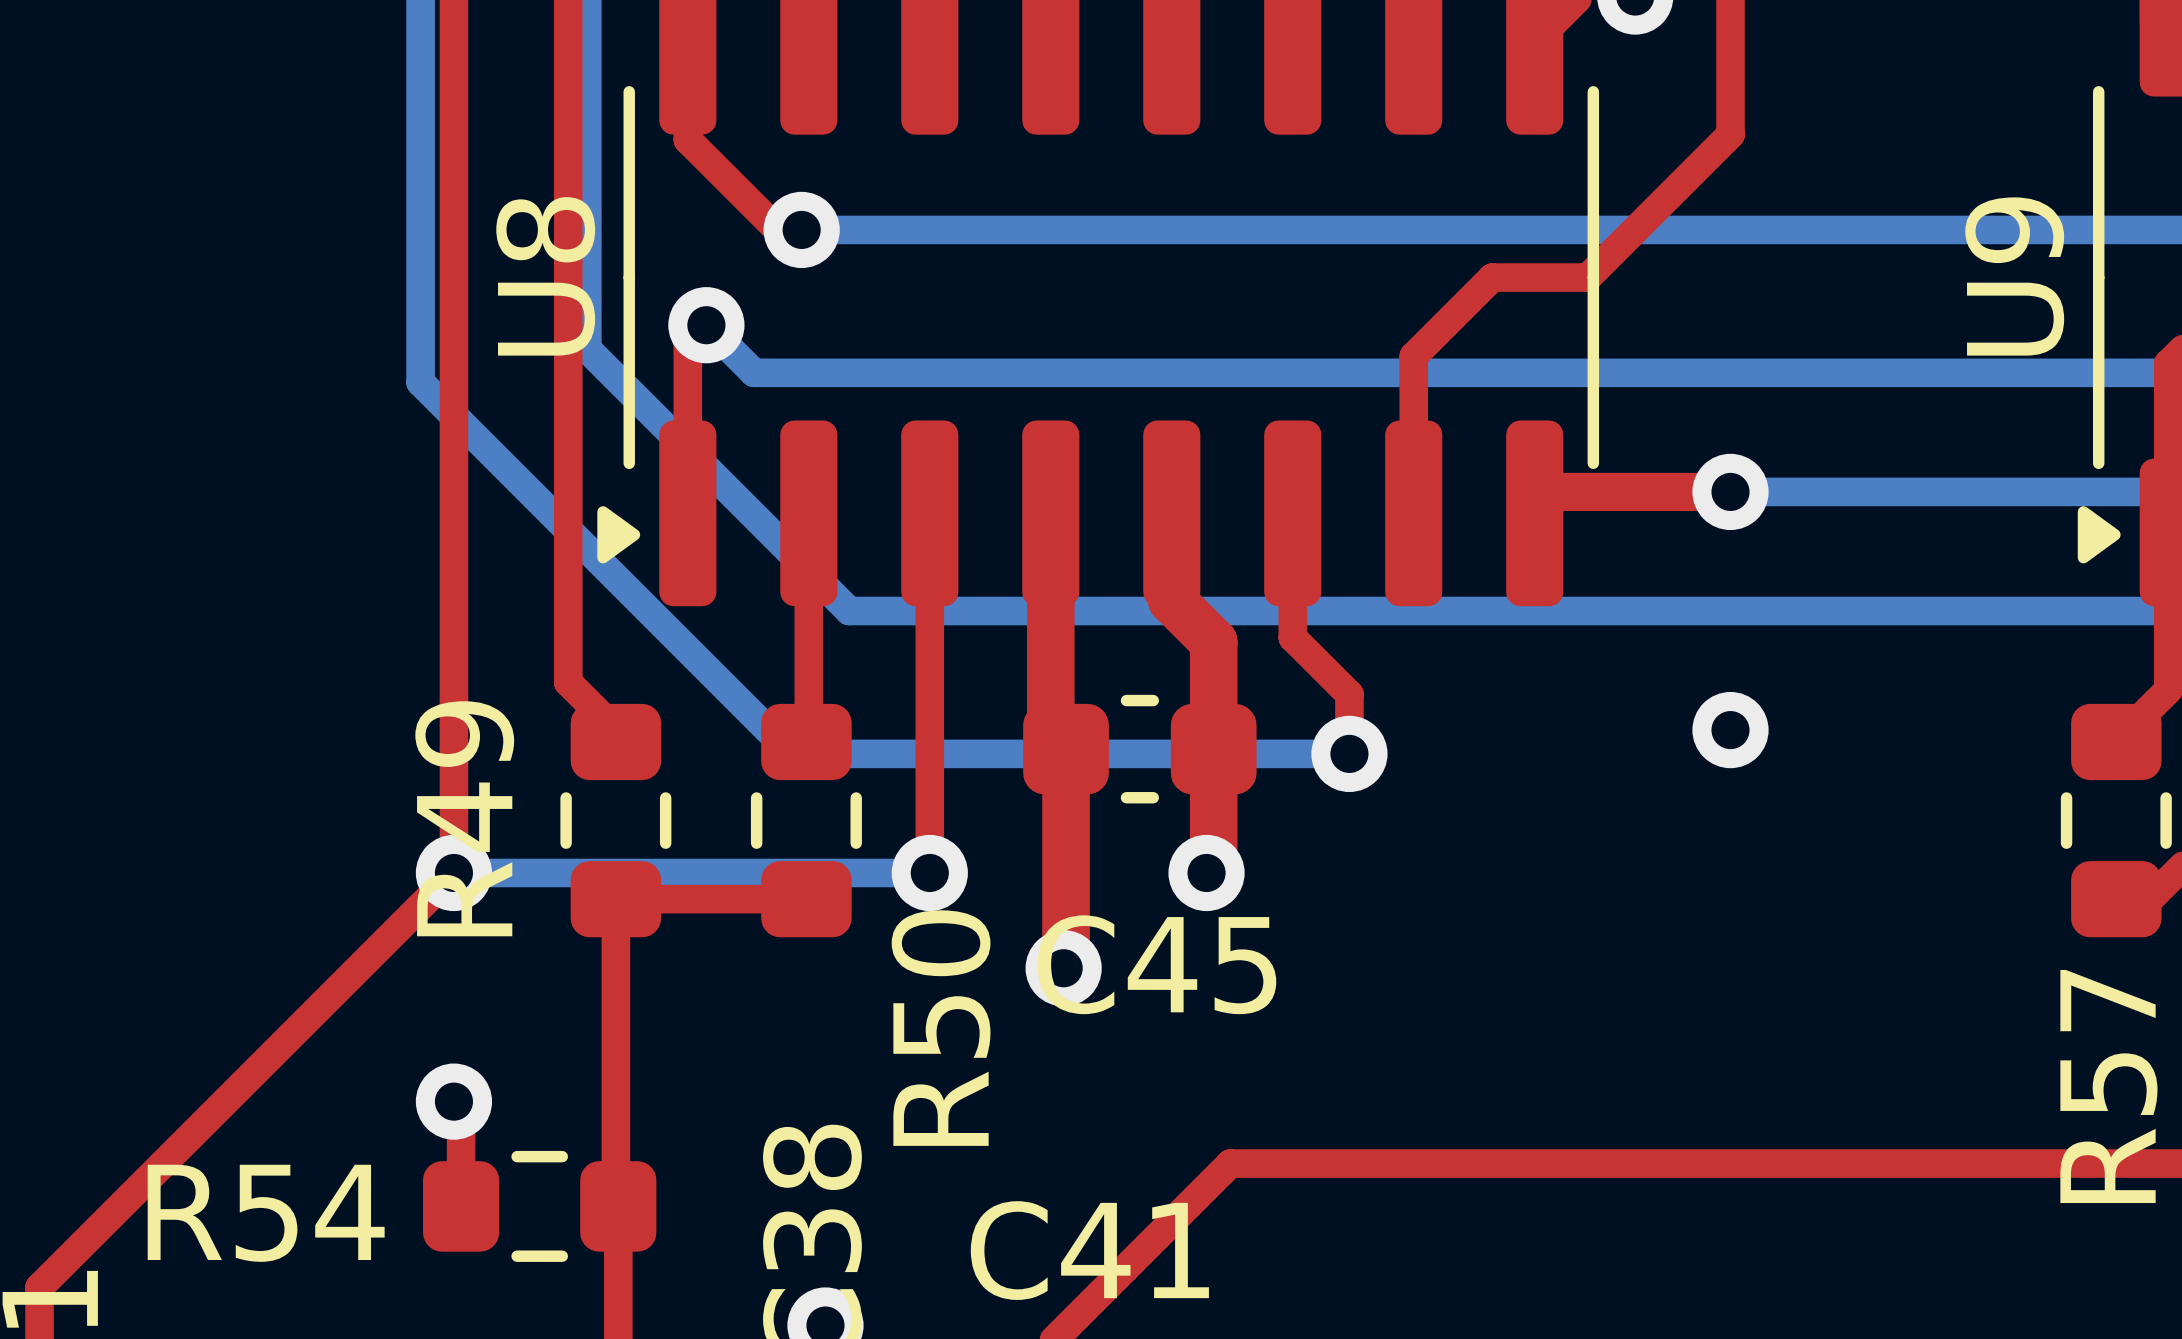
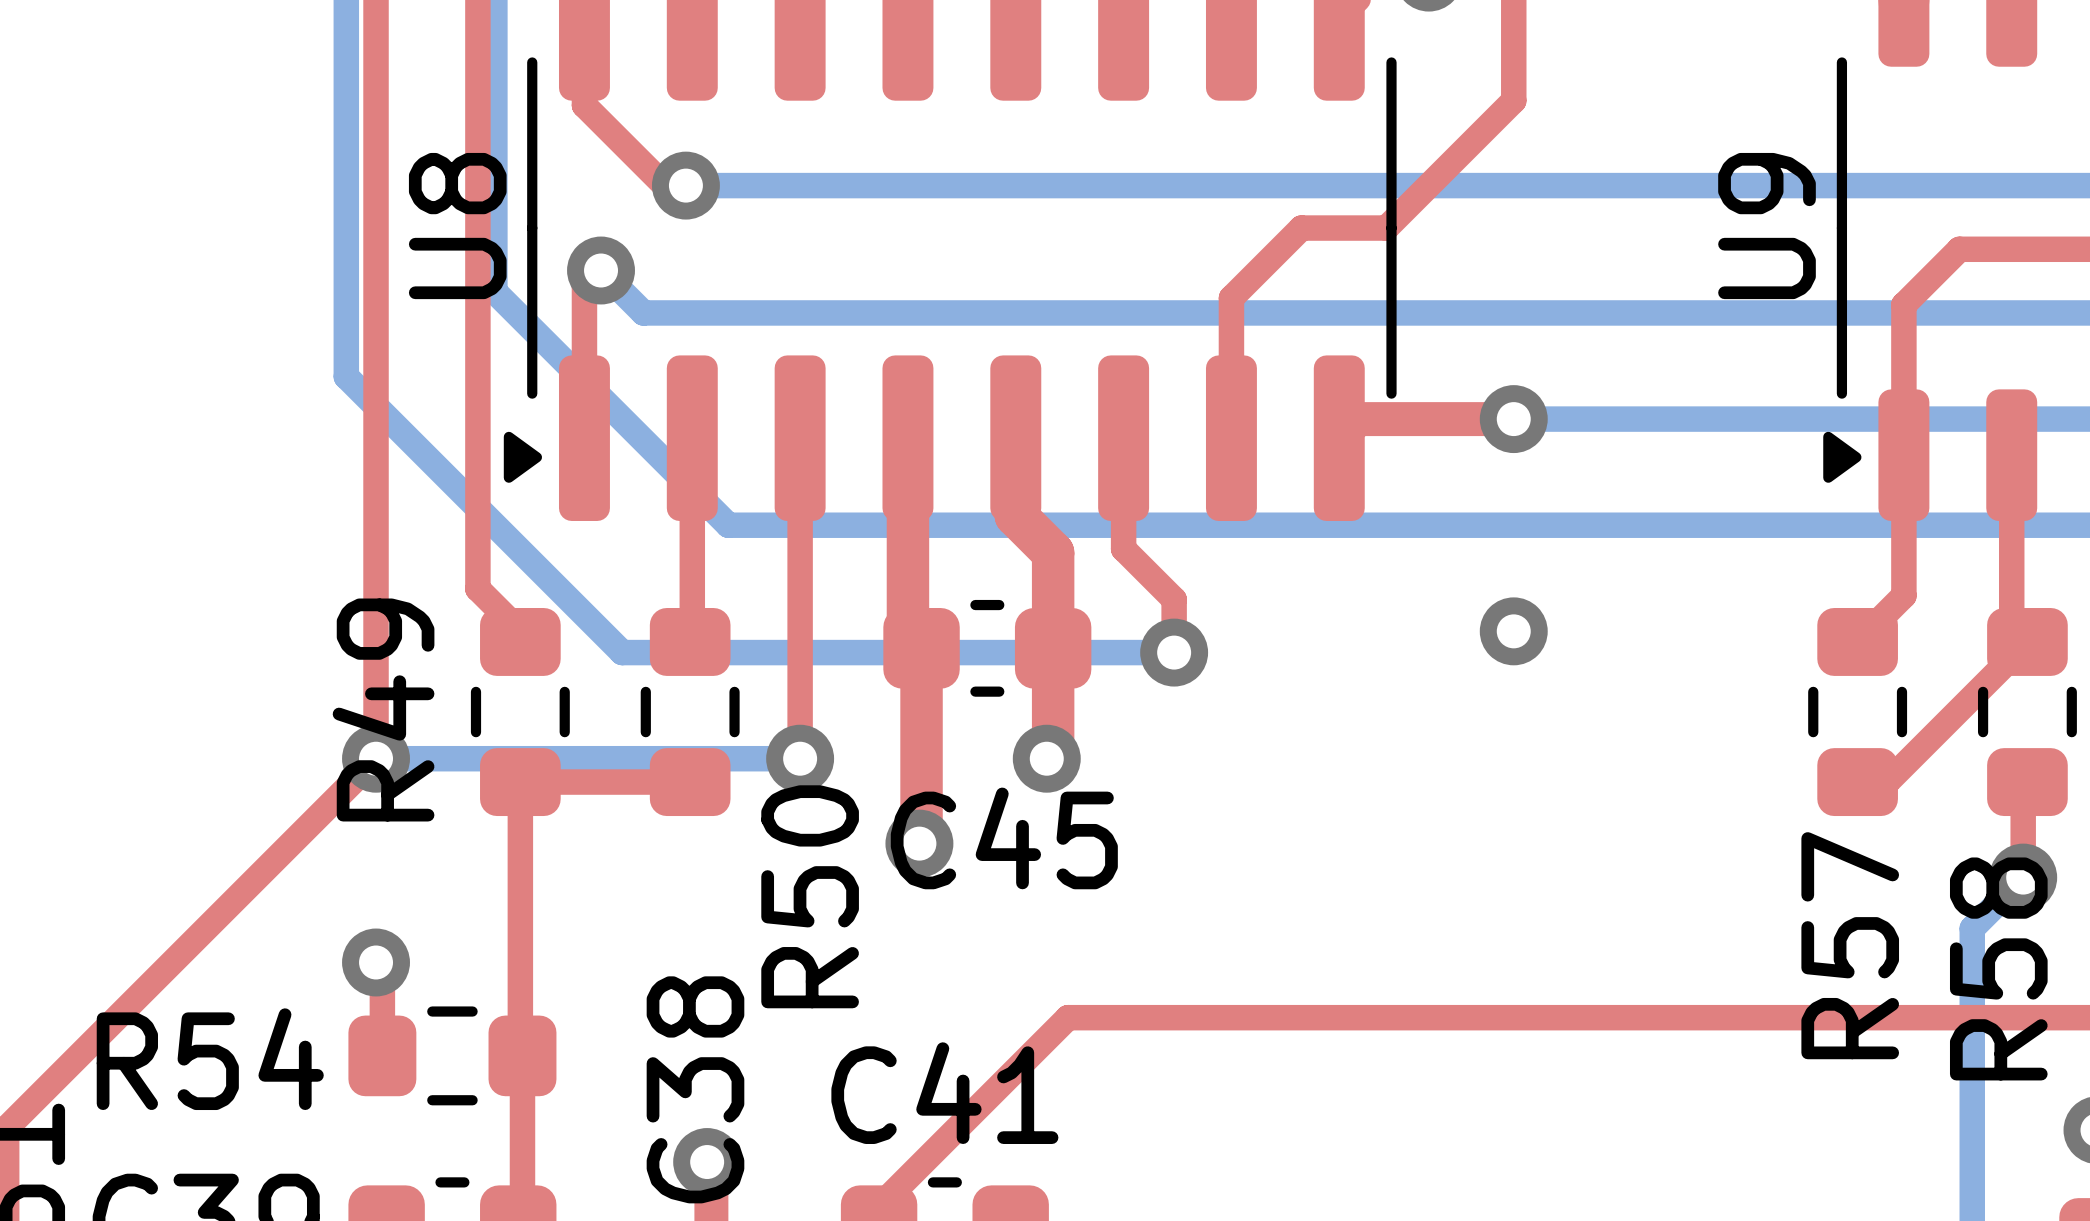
bottom track: (420, 382) (792, 753) -> (346, 321) (346, 376) (622, 652) (677, 652)

